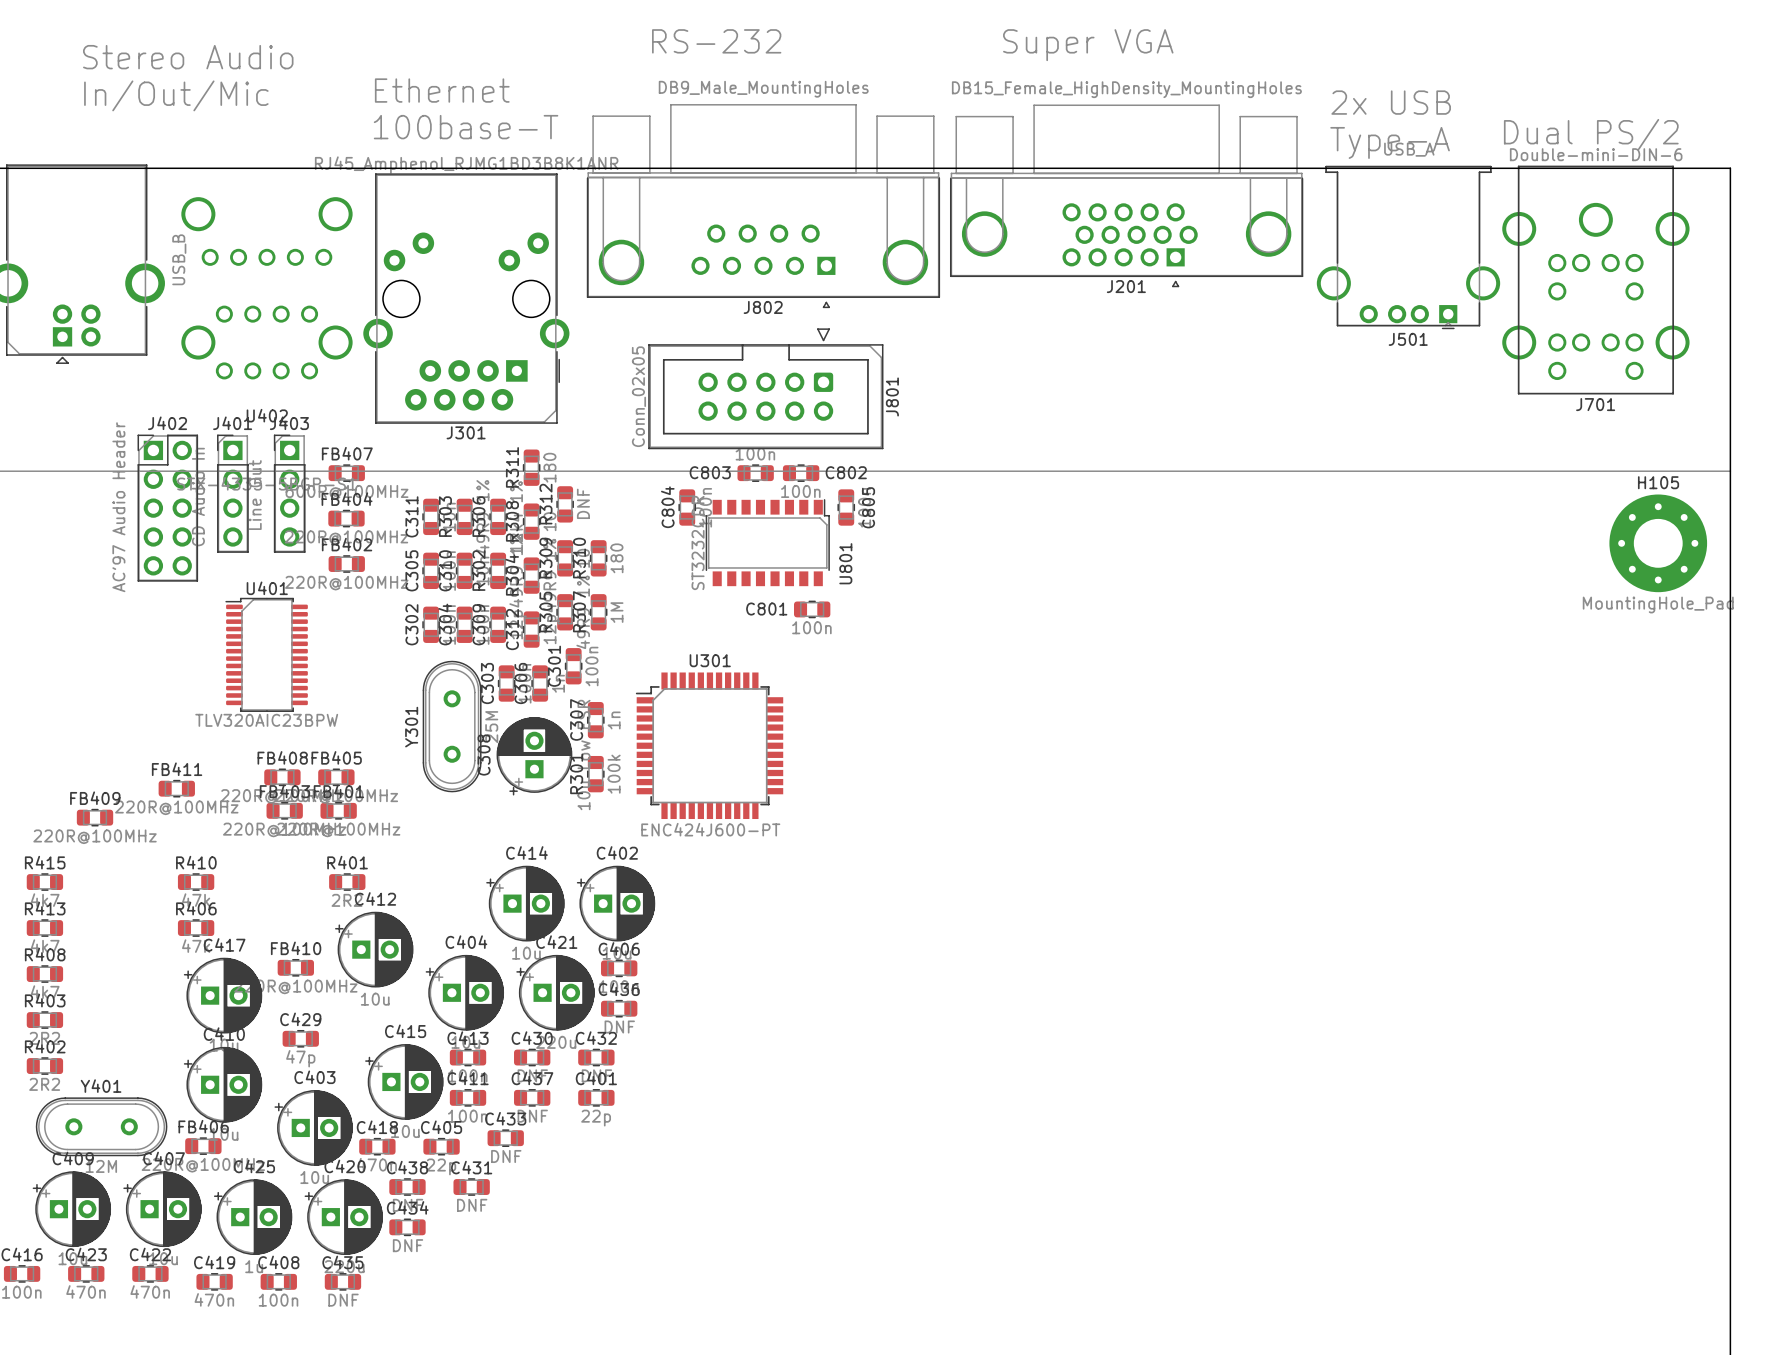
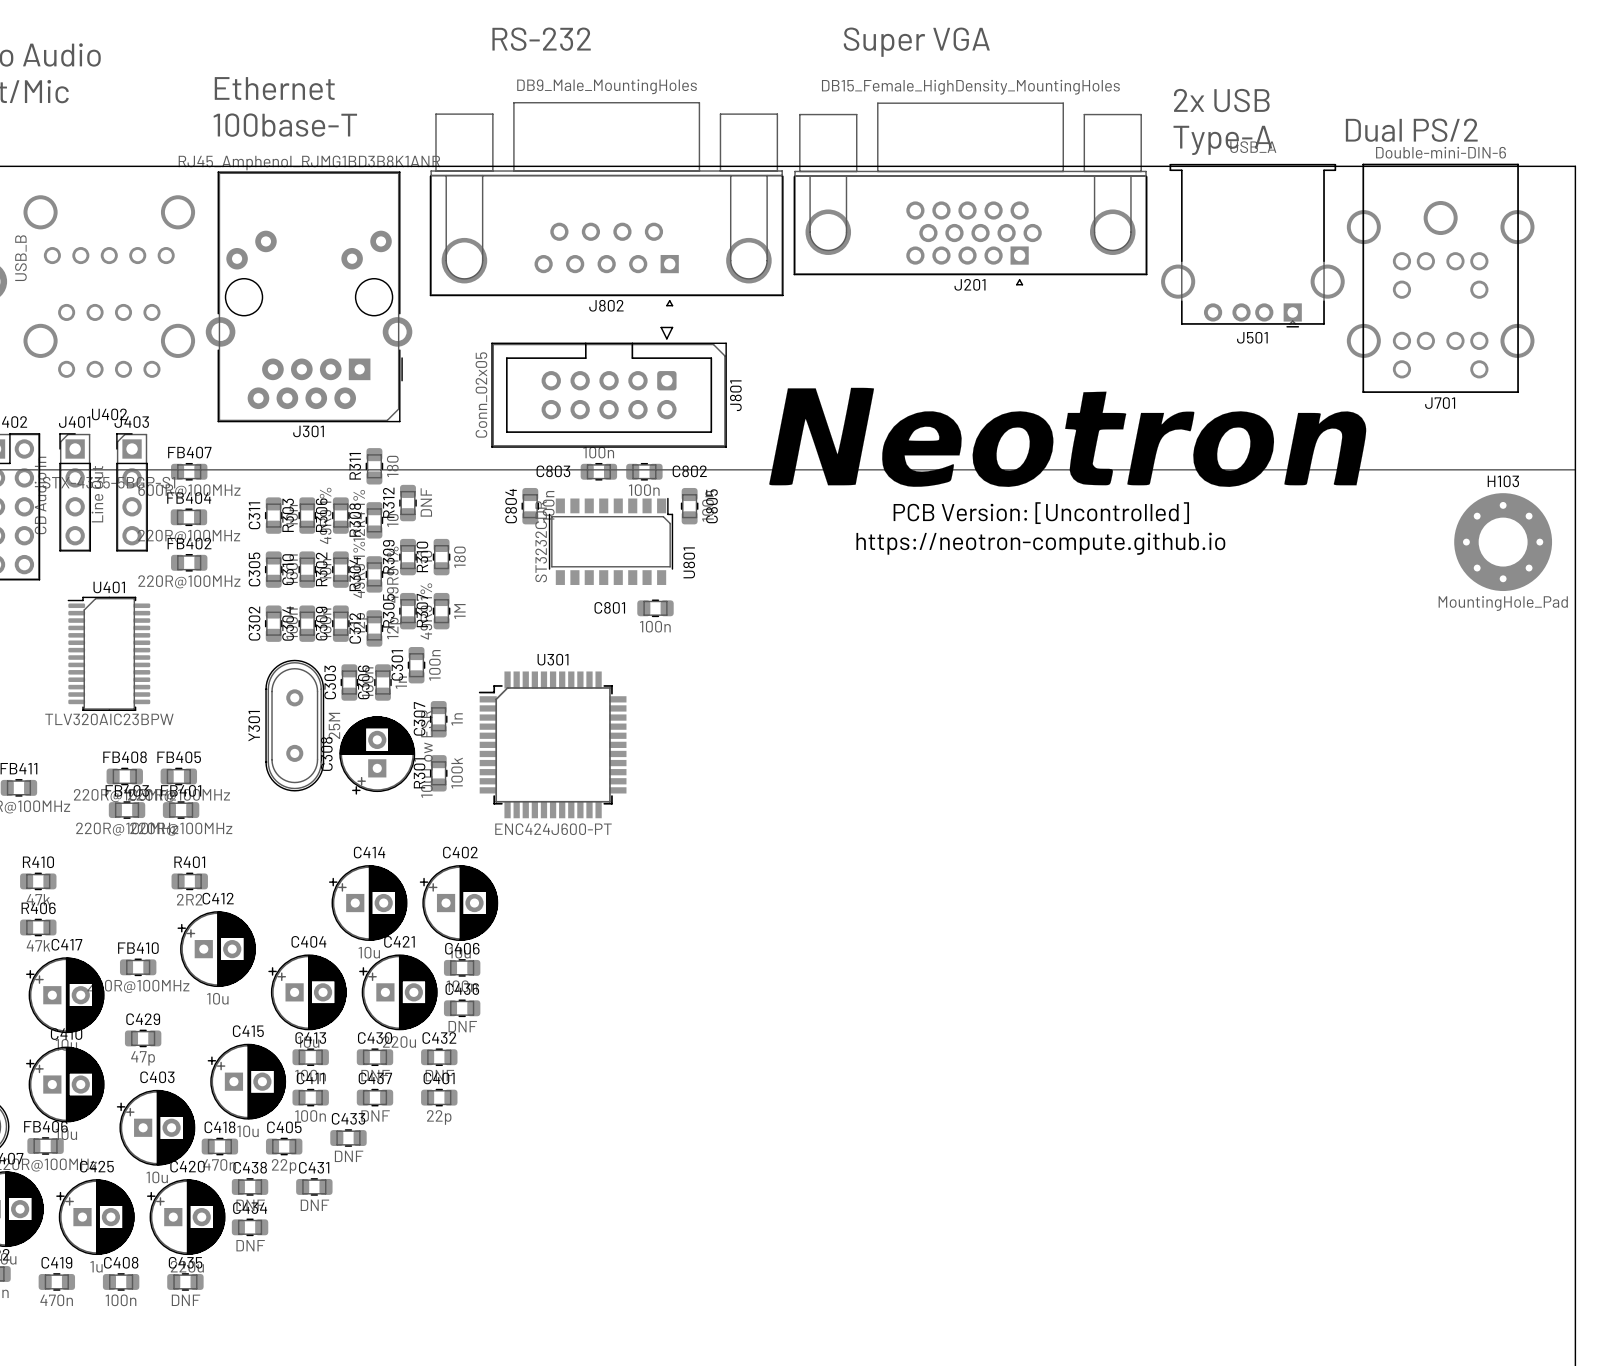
drawing: none -> [769, 387, 1367, 487]
H105 name: H105 (1658, 482) -> H103 (1503, 481)
text: none -> PCB Version: [Uncontrolled] (1041, 513)
text: none -> https://neotron-compute.github.io (1040, 543)

